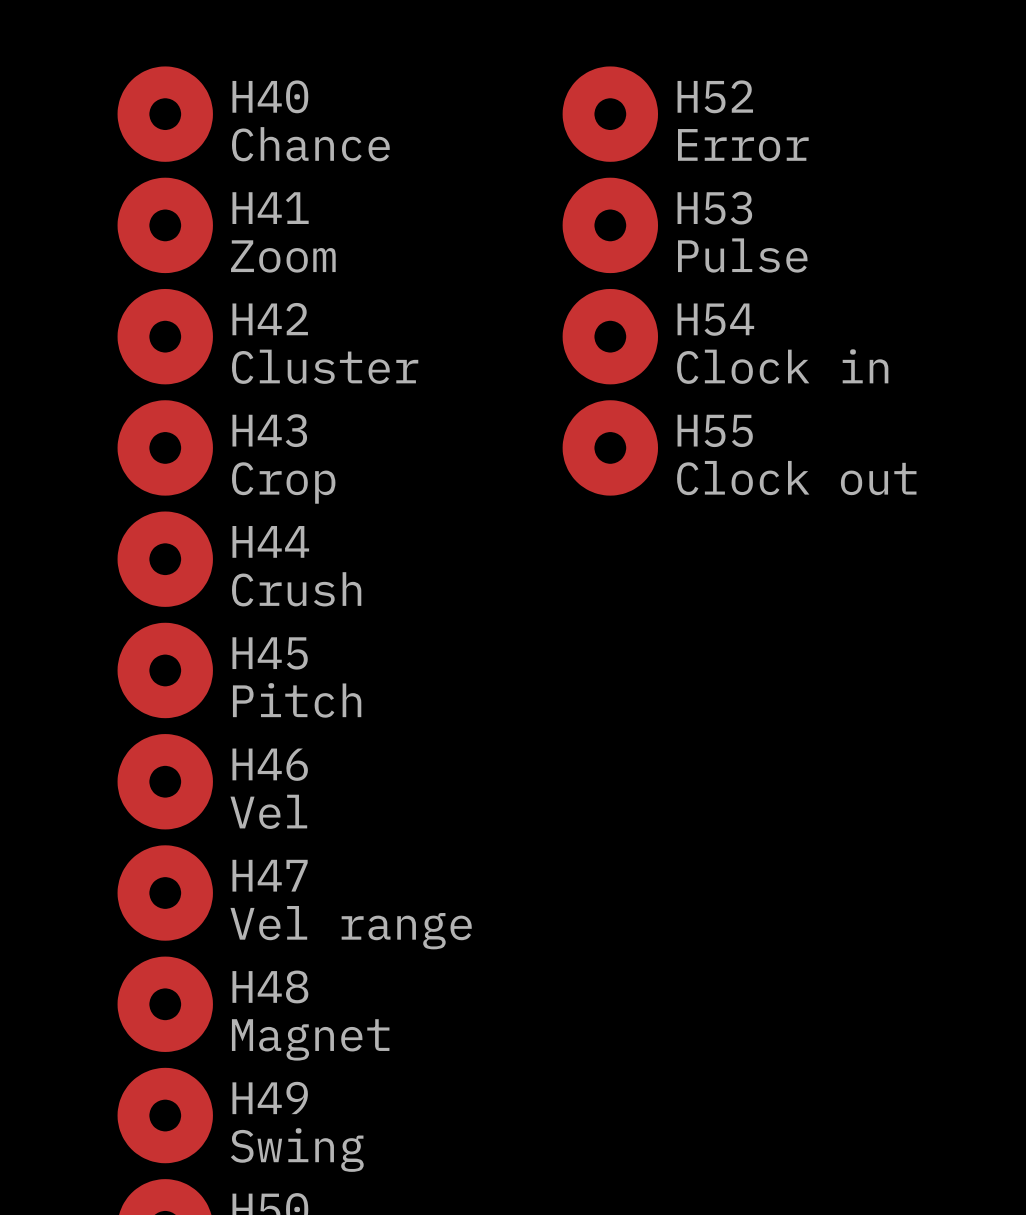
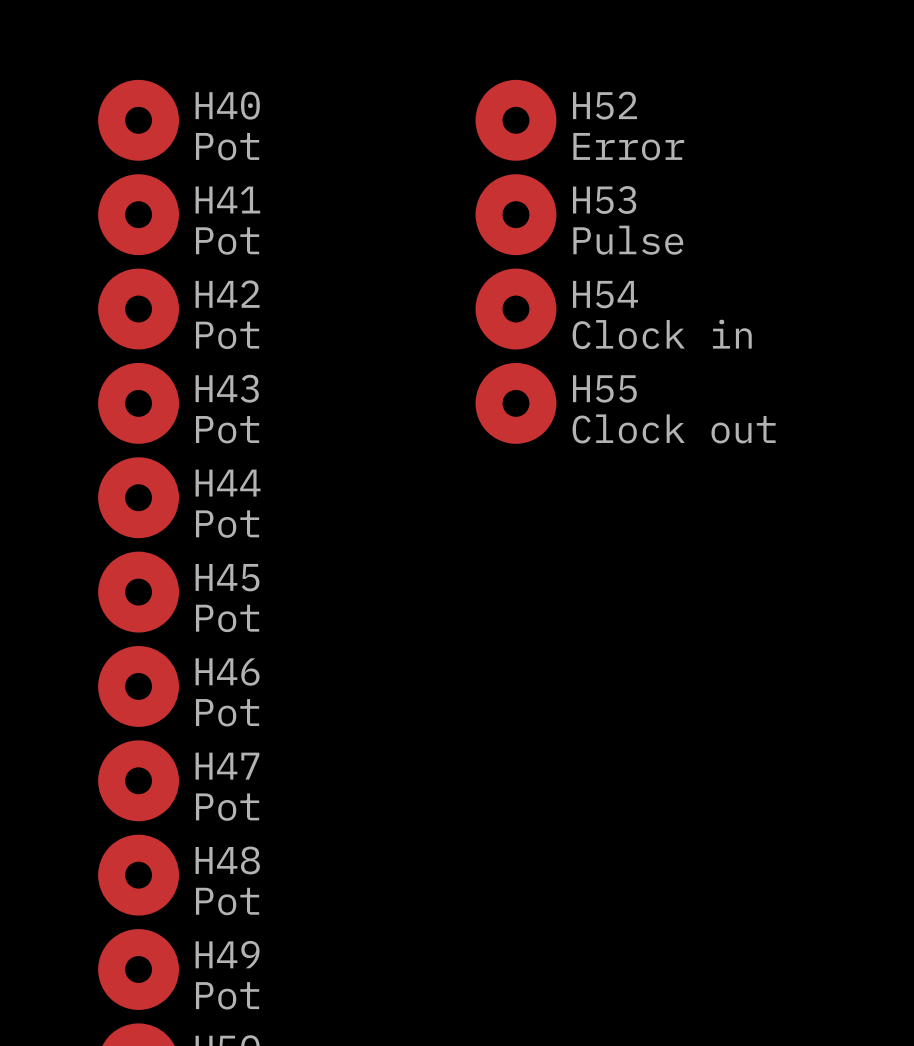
H40 value: Chance (310, 144) -> Pot (227, 146)
H41 value: Zoom (283, 256) -> Pot (227, 241)
H42 value: Cluster (325, 366) -> Pot (227, 335)
H43 value: Crop (283, 483) -> Pot (227, 429)
H44 value: Crush (296, 589) -> Pot (227, 524)
H45 value: Pitch (297, 700) -> Pot (227, 618)
H46 value: Vel (268, 811) -> Pot (227, 712)
H47 value: Vel range (351, 927) -> Pot (227, 807)
H48 value: Magnet (310, 1039) -> Pot (227, 901)
H49 value: Swing (297, 1150) -> Pot (227, 995)

